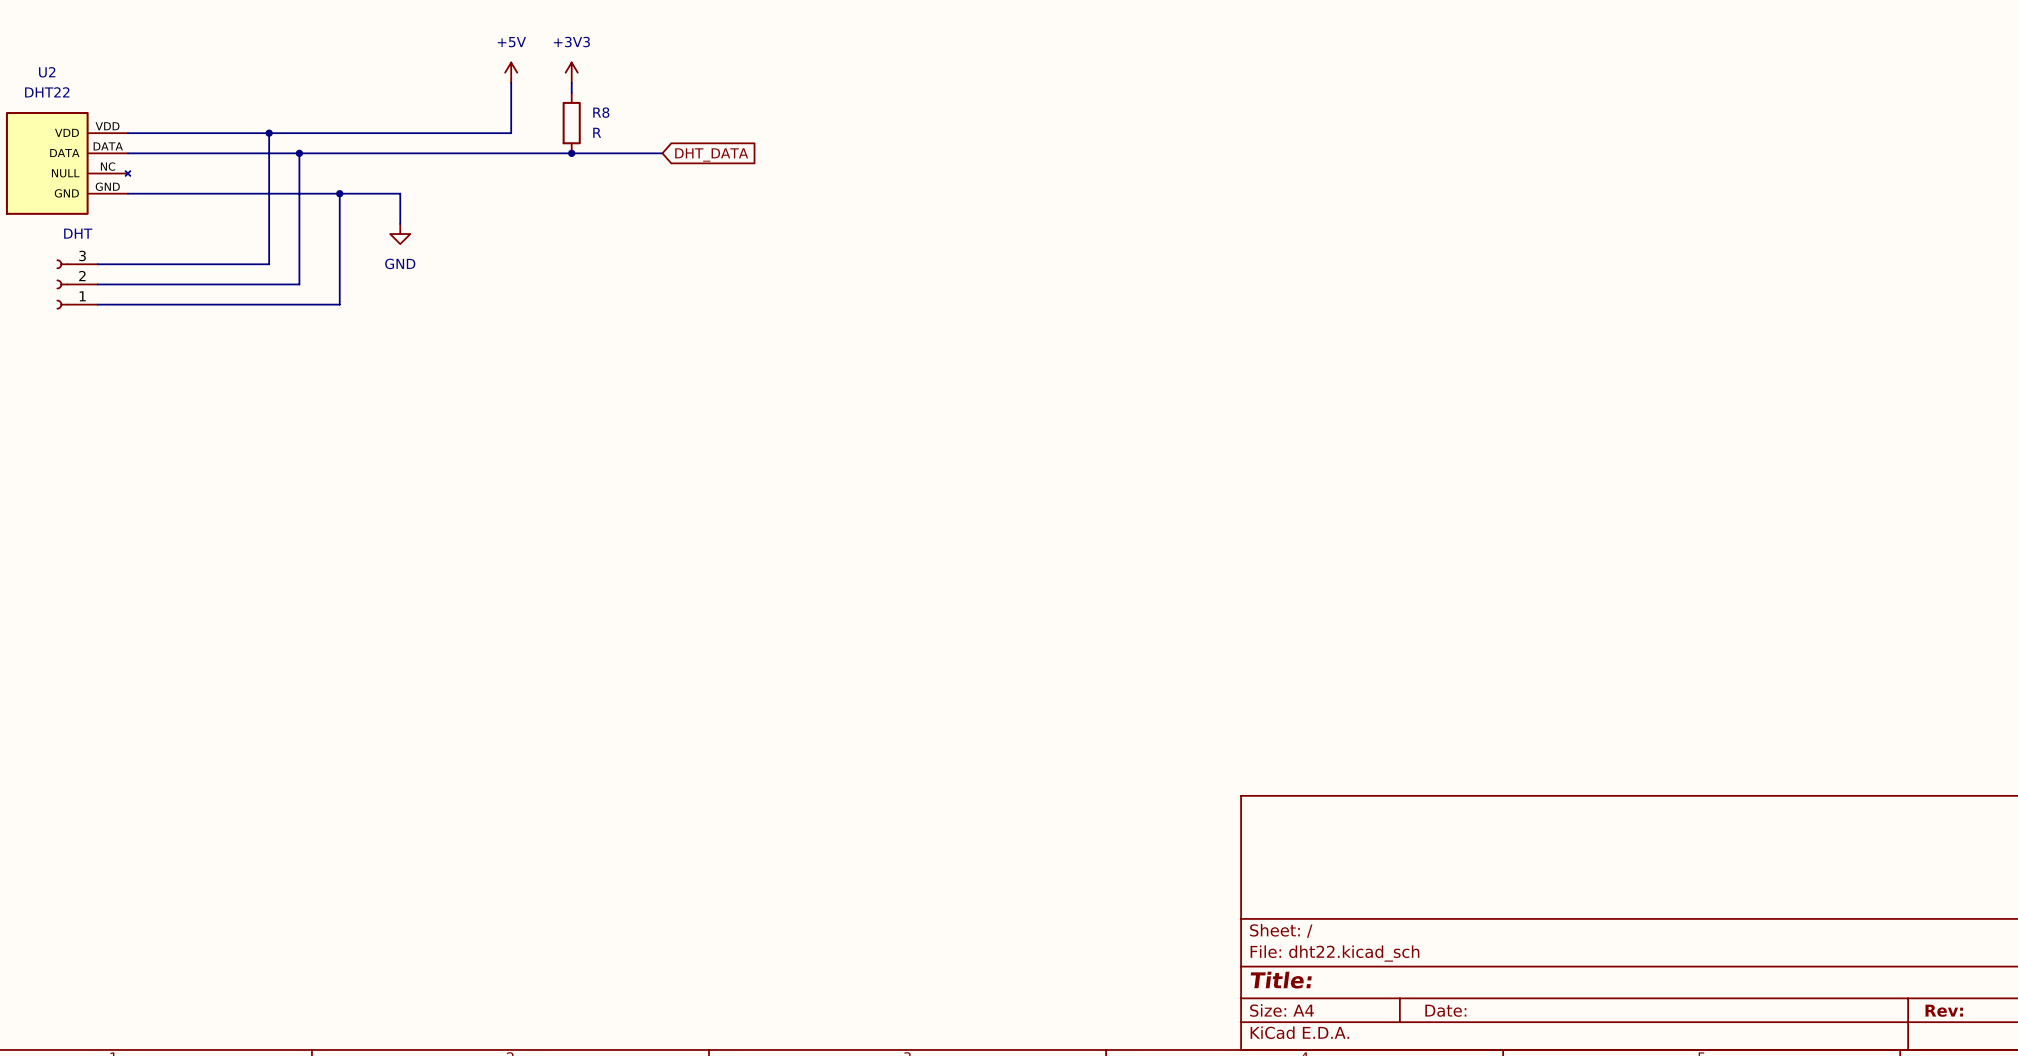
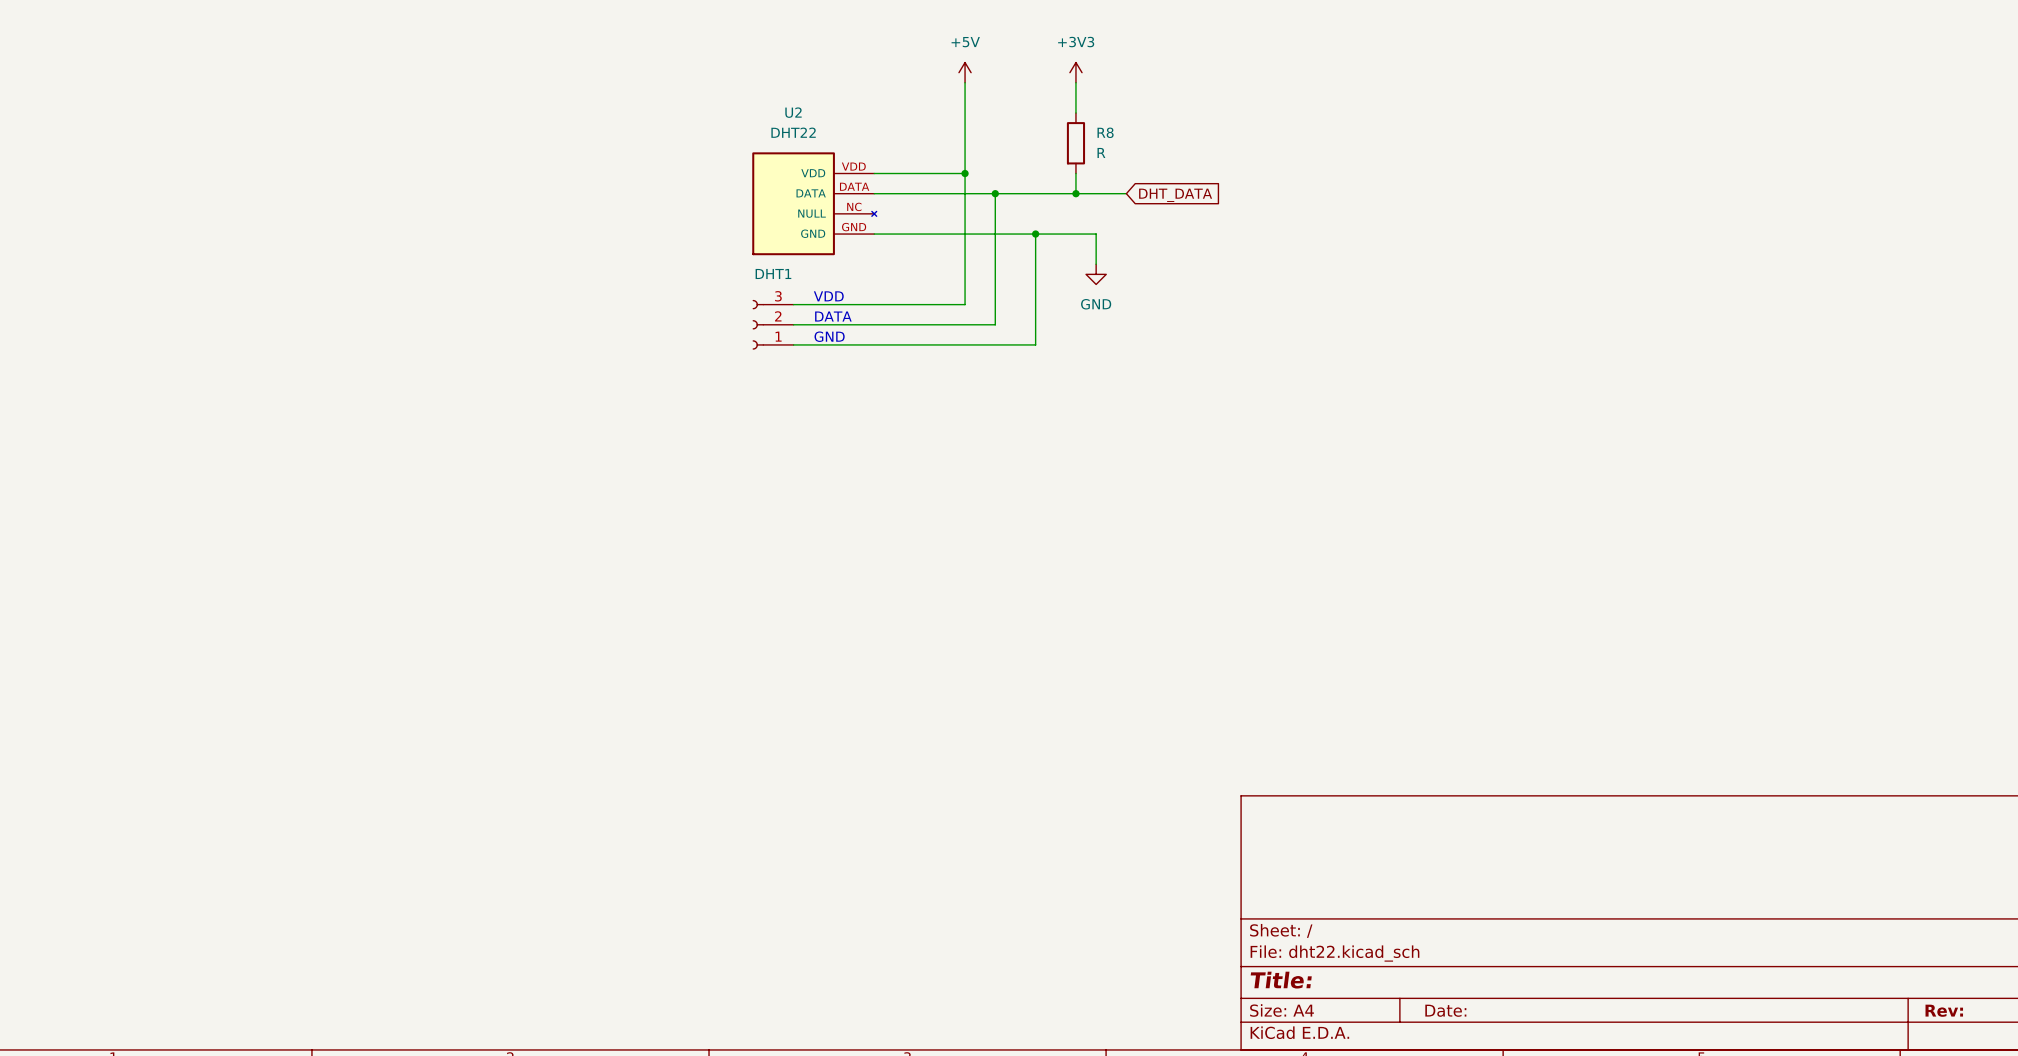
power symbol: +5V (511, 72) -> none
power symbol: +3V3 (571, 72) -> none
power symbol: none -> +5V (965, 72)
power symbol: none -> +3V3 (1075, 72)
wire: (511, 82) (511, 133) (127, 133) -> none
wire: (571, 82) (571, 92) -> none
wire: none -> (965, 82) (965, 304) (793, 304)
wire: none -> (1075, 82) (1075, 113)
R8 position: (571, 123) -> (1075, 143)
wire: (269, 133) (269, 264) (97, 264) -> none
junction: (269, 133) -> none
wire: (127, 153) (662, 153) -> none
wire: (299, 153) (299, 284) (97, 284) -> none
junction: (299, 153) -> none
junction: (571, 153) -> none
global label: DHT_DATA (711, 154) -> none
U2 position: (68, 163) -> (814, 203)
wire: none -> (874, 173) (965, 173)
junction: none -> (965, 173)
wire: none -> (1075, 173) (1075, 193)
wire: (127, 193) (400, 193) (400, 223) -> none
wire: (339, 193) (339, 304) (97, 304) -> none
junction: (339, 193) -> none
wire: none -> (874, 193) (1126, 193)
wire: none -> (995, 193) (995, 324) (793, 324)
junction: none -> (995, 193)
junction: none -> (1075, 193)
global label: none -> DHT_DATA (1175, 195)
power symbol: GND (400, 234) -> none
wire: none -> (874, 234) (1096, 234) (1096, 264)
wire: none -> (1035, 234) (1035, 344) (793, 344)
junction: none -> (1035, 234)
power symbol: none -> GND (1096, 274)
DHT: (77, 284) -> none
text: none -> VDD (828, 296)
text: none -> DATA (833, 316)
DHT1: none -> (773, 324)
text: none -> GND (829, 336)

